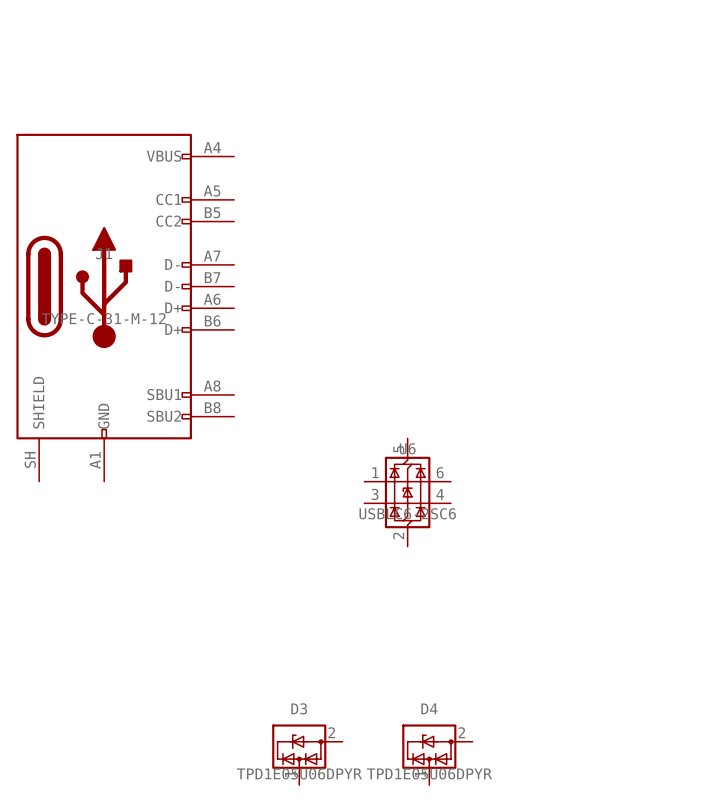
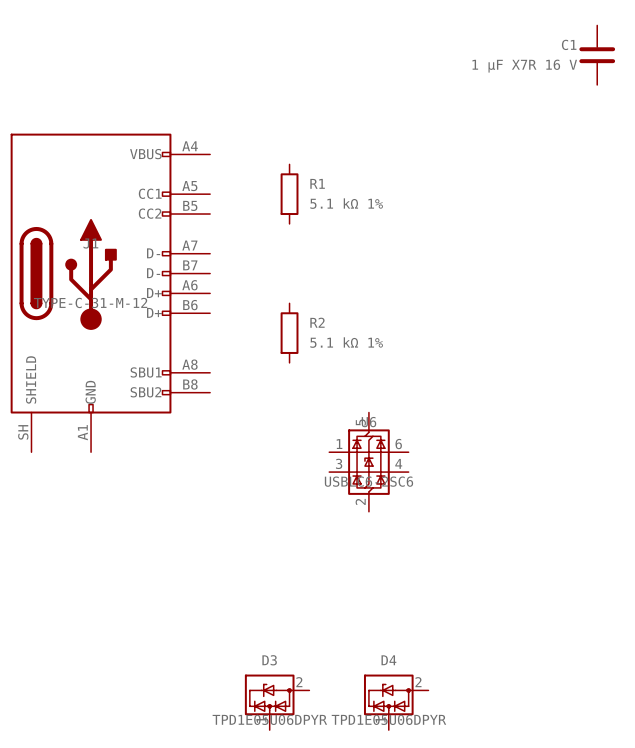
C1: none -> 1 µF X7R 16 V (597, 55)
R1: none -> 5.1 kΩ 1% (289, 194)
R2: none -> 5.1 kΩ 1% (289, 333)

